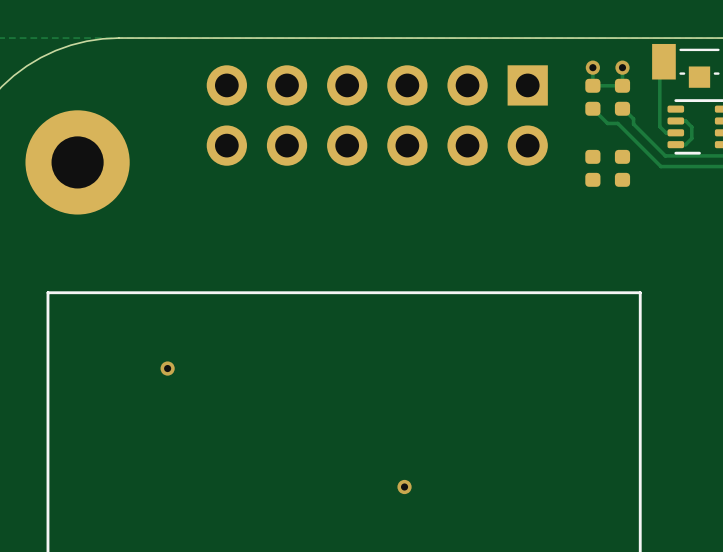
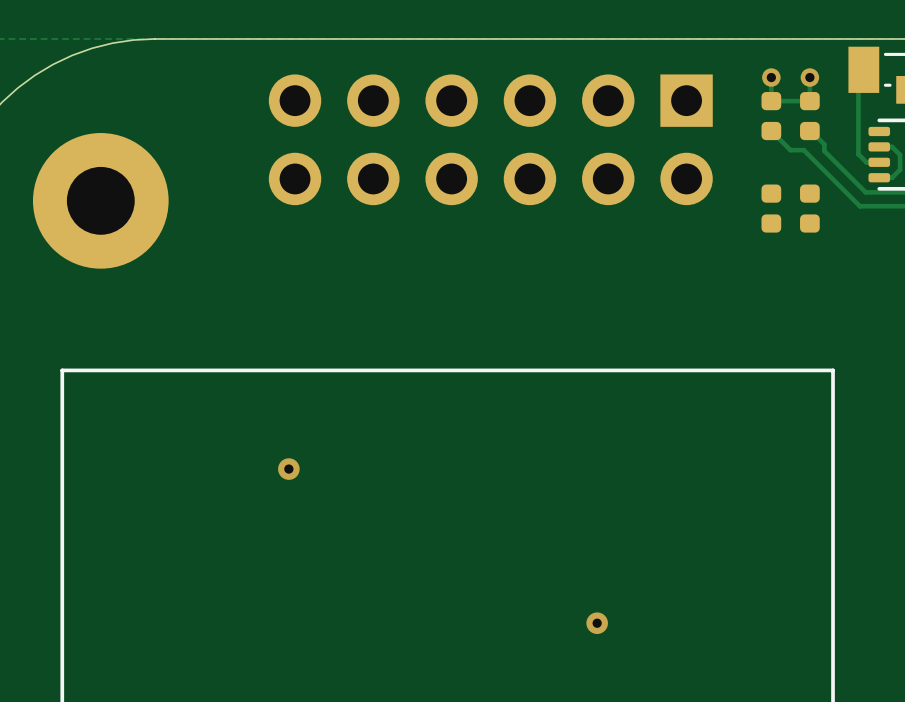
via: (167, 368) -> none
via: none -> (288, 469)
via: (404, 486) -> none
via: none -> (597, 623)

